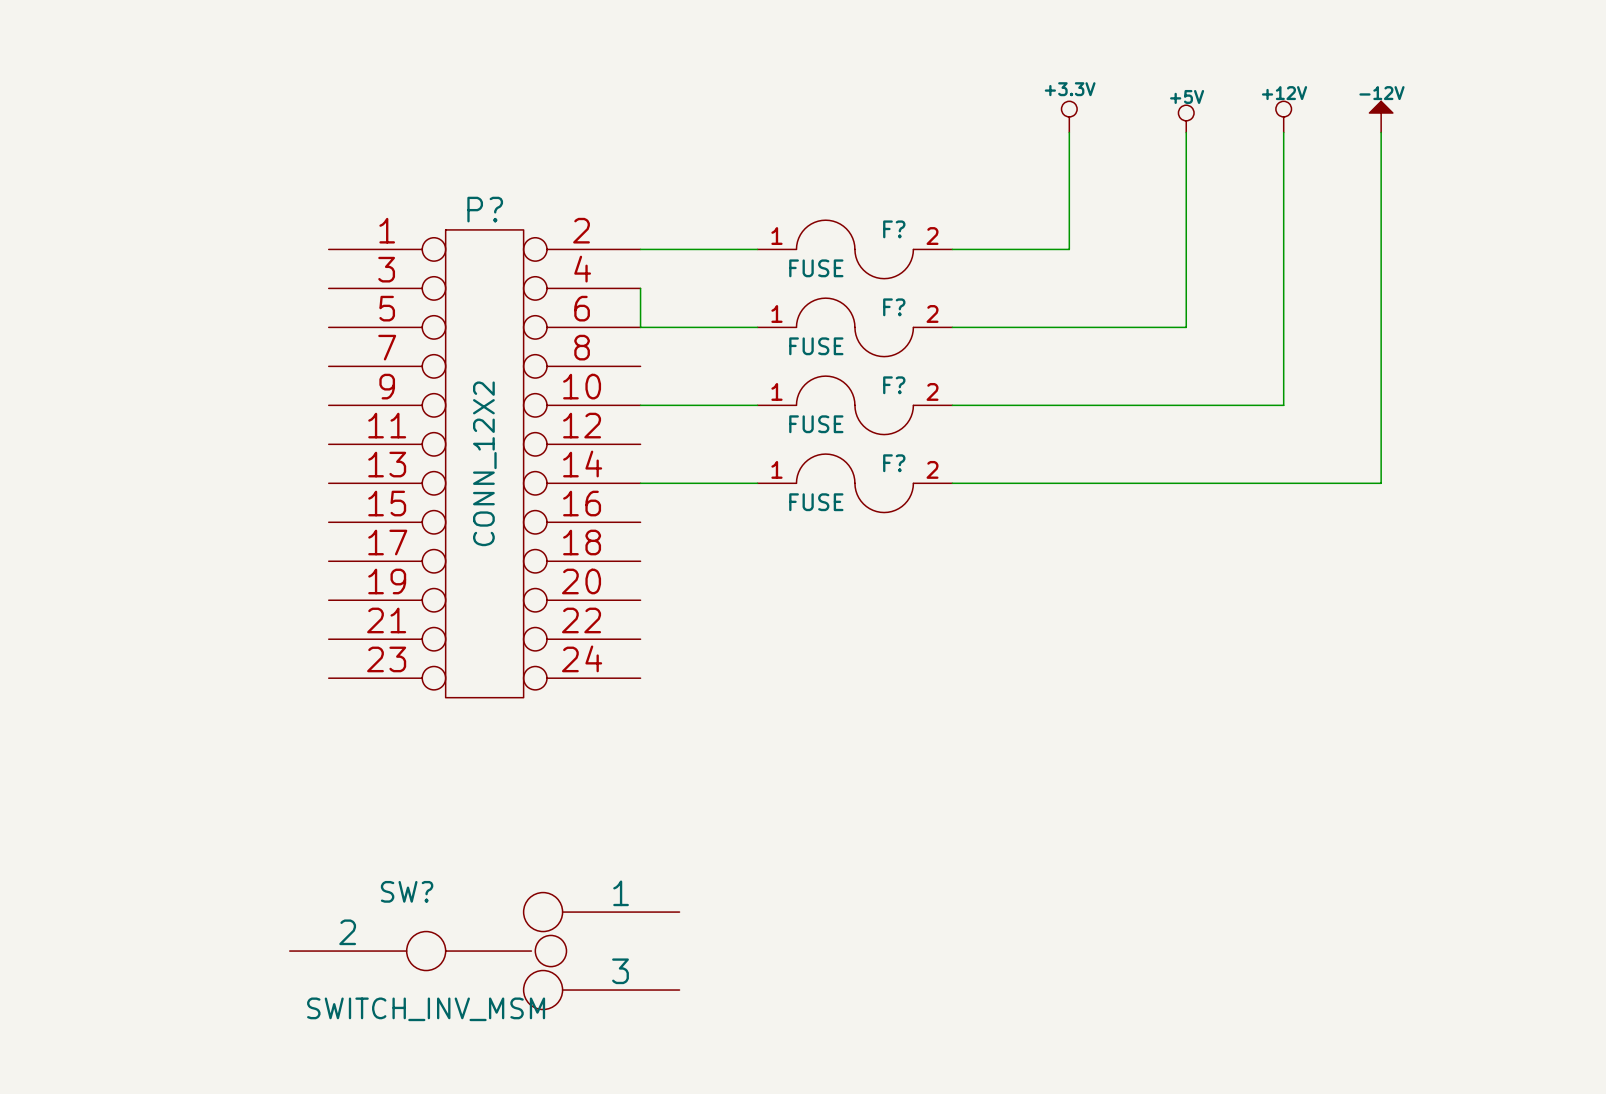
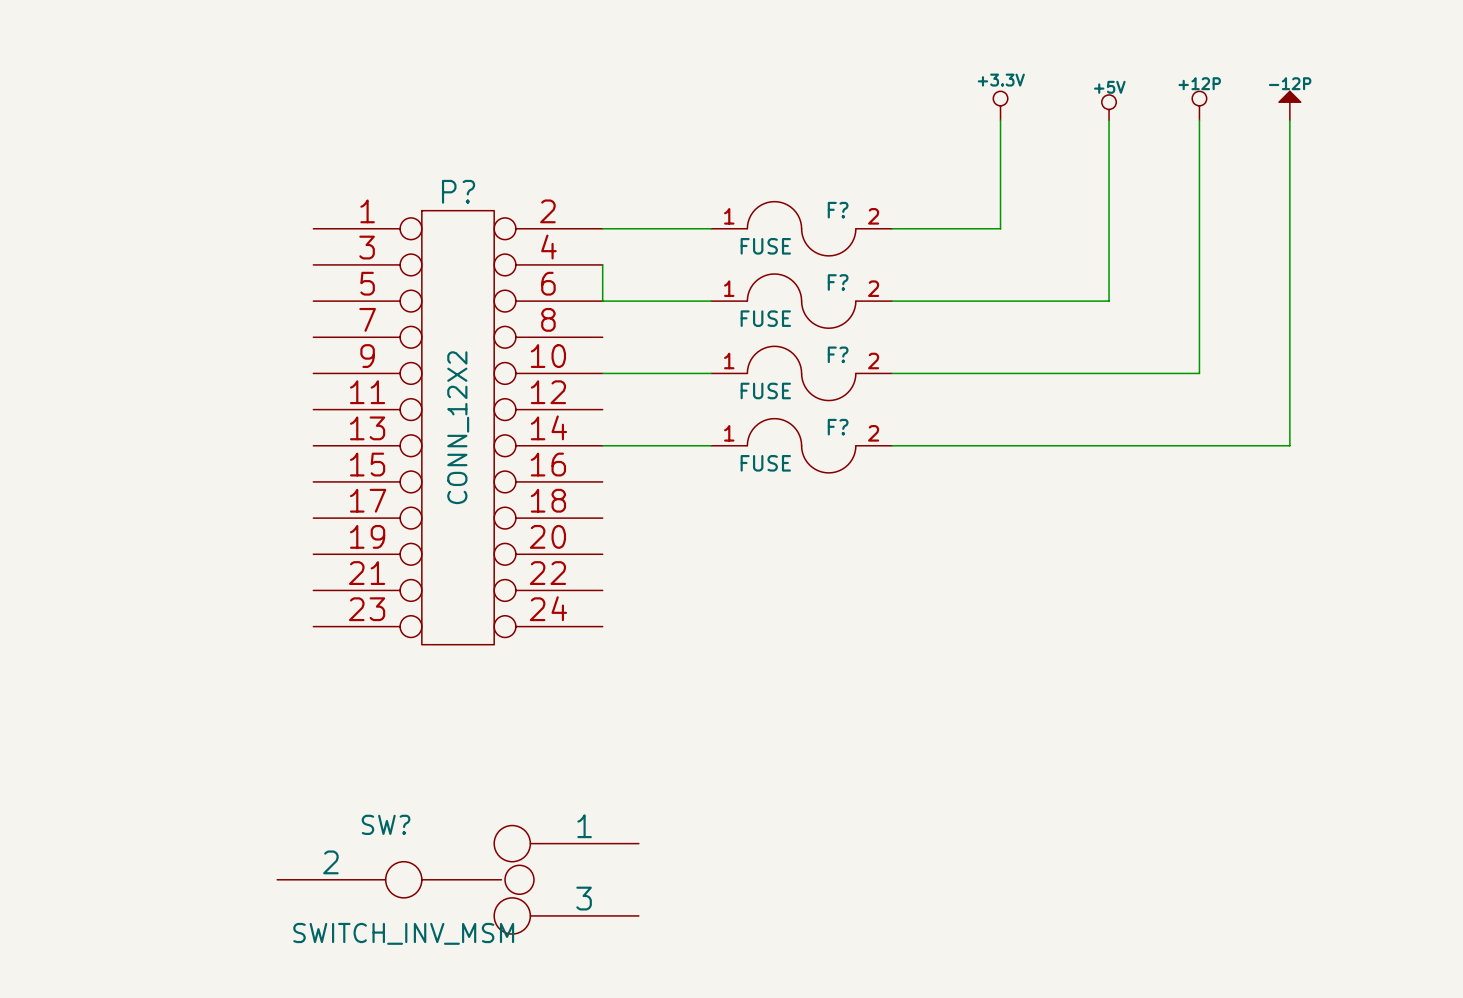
power symbol: +12V (1283, 116) -> +12P (1199, 105)
power symbol: -12V (1381, 116) -> -12P (1289, 105)

